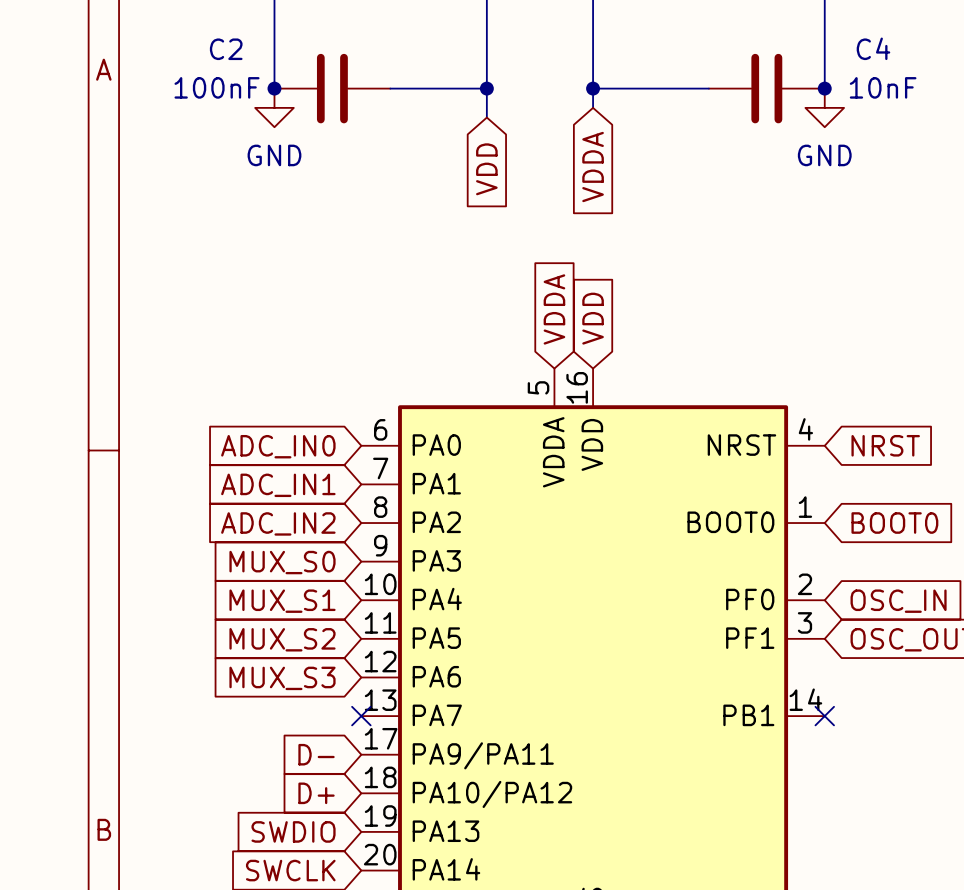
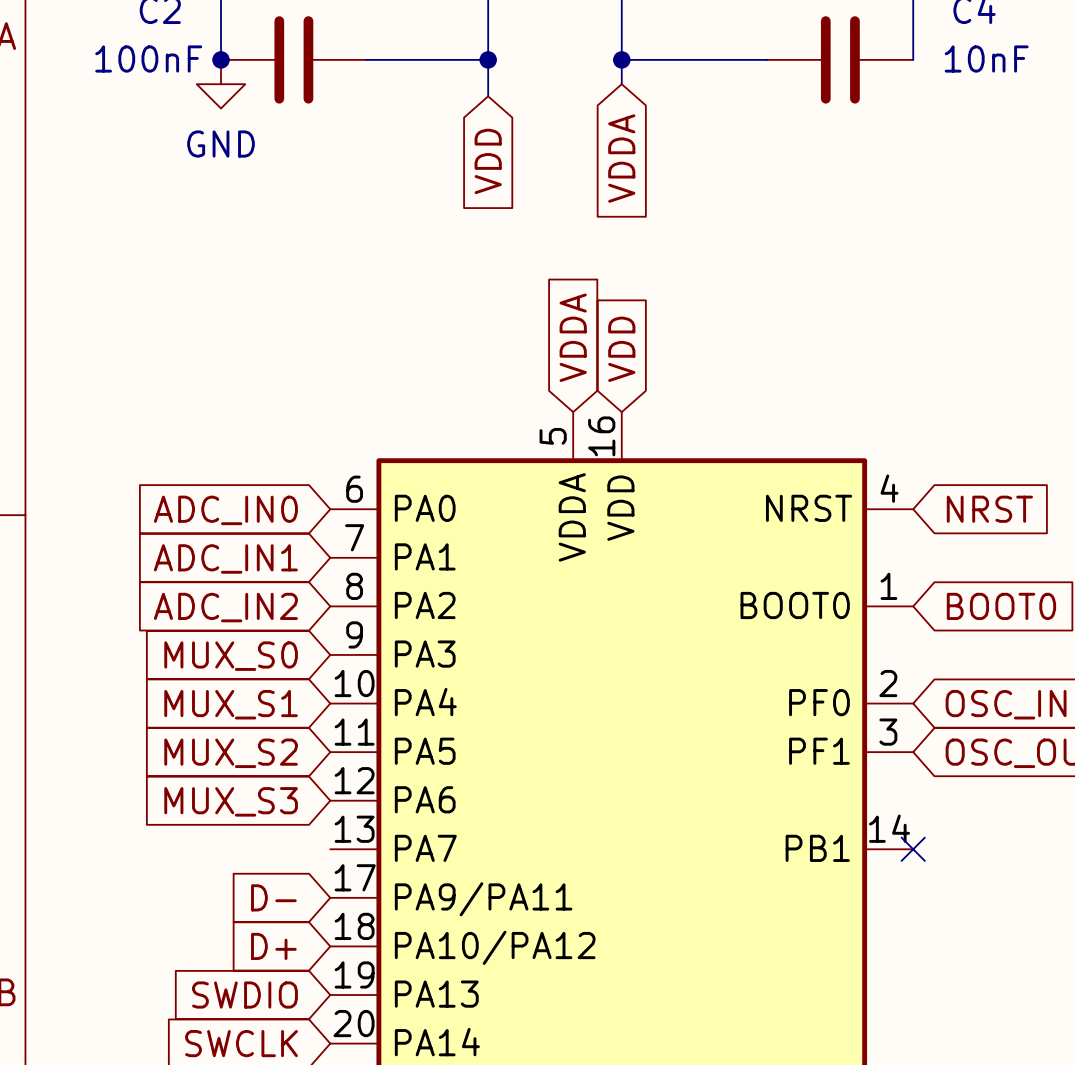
junction: (824, 88) -> none
power symbol: GND (824, 107) -> none
no-connect mark: (361, 716) -> none

